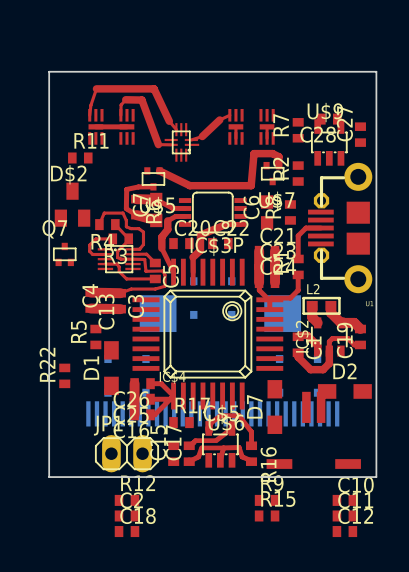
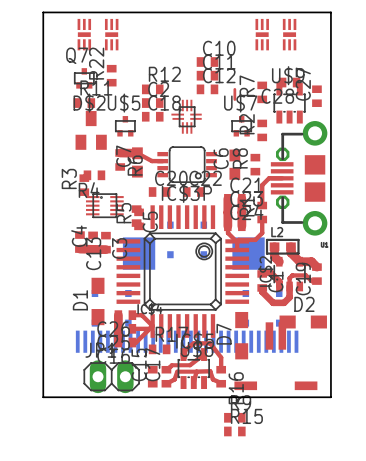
part: none -> (84, 34)
part: none -> (111, 34)
part: none -> (262, 34)
part: none -> (289, 34)
board edge: (49, 71) (376, 71) -> (43, 40) (43, 12) (330, 12) (330, 40)
top track: (89, 115) (96, 88) (154, 88) (169, 121) (176, 129) -> none
top track: (120, 115) (121, 105) (125, 99) (141, 100) (158, 144) (171, 144) -> none
top track: (229, 115) (219, 120) (202, 136) (191, 139) -> none
top track: (95, 126) (126, 126) -> none
part: (95, 126) -> none
part: (126, 126) -> none
top track: (235, 126) (235, 138) -> none
part: (235, 126) -> none
part: (267, 126) -> none
part rotation: 0° (181, 142) -> 180° (186, 116)
part position: (181, 142) -> (186, 116)
R11 position: (80, 157) -> (84, 103)
top track: (278, 165) (278, 156) (272, 153) (254, 153) (251, 185) (189, 185) (159, 170) -> none
U$7 rotation: 0° (272, 173) -> 180° (241, 126)
U$5 rotation: 0° (153, 178) -> 180° (125, 126)
U$5 position: (153, 178) -> (125, 126)
top track: (153, 186) (126, 189) (126, 208) (136, 215) (156, 220) -> none
D$2 position: (72, 204) -> (91, 130)
top track: (185, 216) (175, 216) (167, 220) (167, 229) (161, 237) (161, 248) (173, 272) -> none
top track: (99, 224) (104, 213) (122, 213) (126, 220) (126, 226) (138, 228) (143, 232) (143, 244) (139, 249) (132, 249) -> none
top track: (115, 224) (128, 238) (117, 251) (117, 257) (144, 259) (145, 271) (162, 270) (164, 275) (164, 286) (155, 289) (131, 289) (120, 293) (90, 292) -> none
top track: (240, 224) (225, 224) (200, 235) (200, 250) (192, 257) (193, 272) -> none
top track: (112, 238) (95, 238) (89, 245) (89, 251) (92, 254) (105, 254) -> none
R3 rotation: 0° (120, 238) -> 90° clockwise (84, 185)
R3 position: (120, 238) -> (84, 185)
Q7 position: (64, 254) -> (84, 78)
top track: (132, 254) (146, 254) (155, 263) -> none
top track: (105, 264) (117, 264) (119, 271) (126, 278) (155, 278) -> none
R5 position: (95, 336) -> (139, 219)
R22 position: (64, 375) -> (111, 75)
R12 position: (126, 500) -> (152, 89)
C10 position: (344, 500) -> (207, 62)
C2 position: (126, 515) -> (152, 103)
C11 position: (344, 515) -> (207, 75)
C18 position: (126, 531) -> (152, 116)
C12 position: (344, 531) -> (207, 89)

